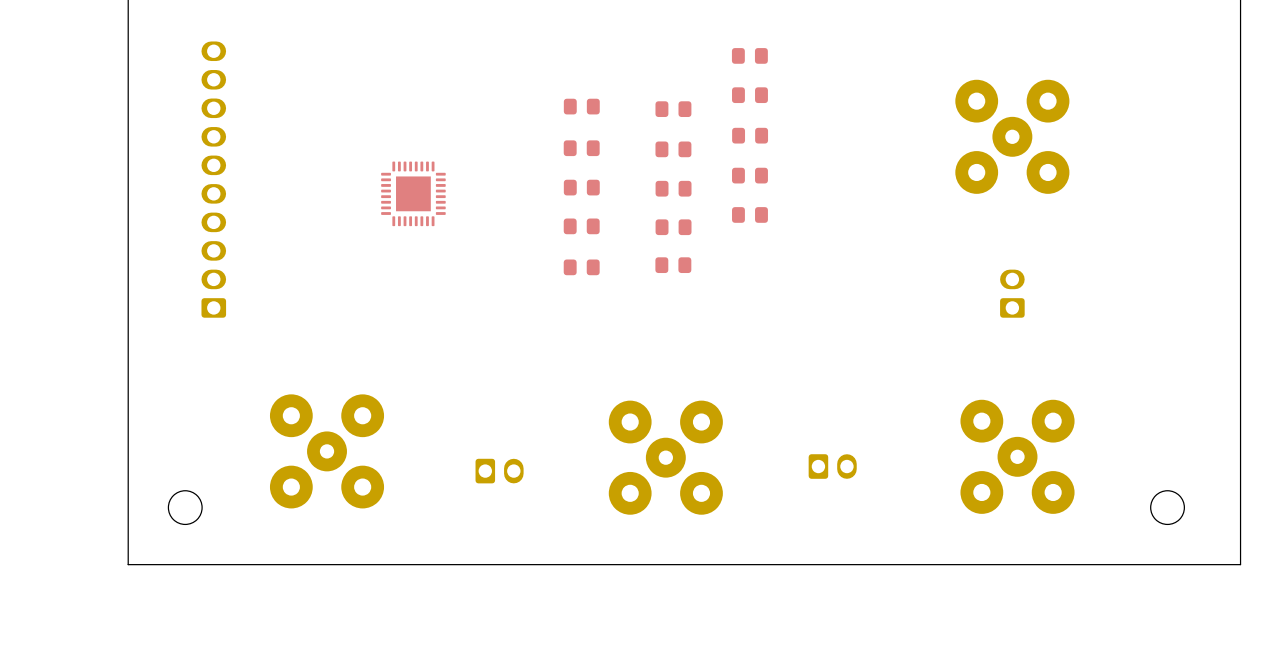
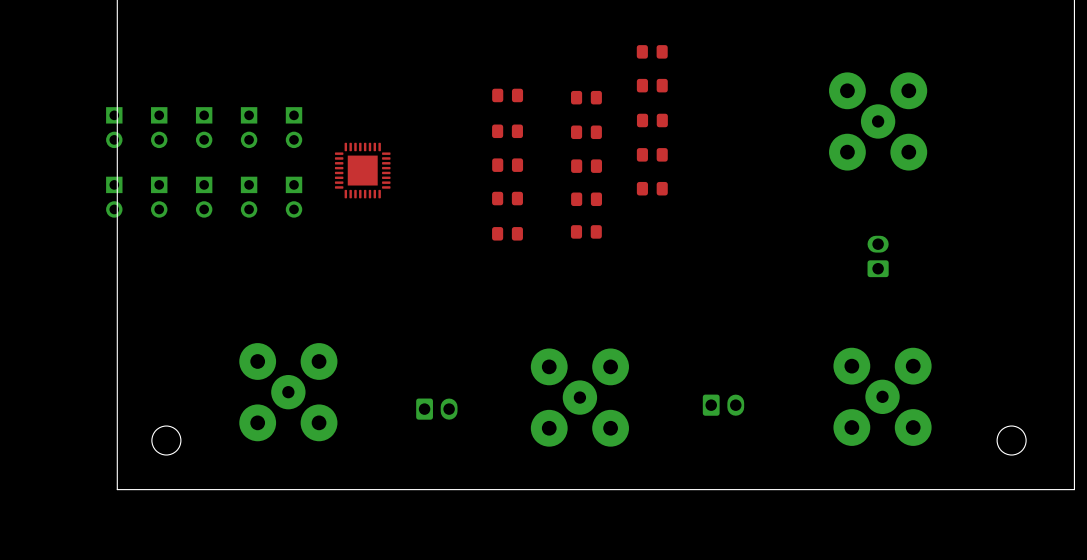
part: none -> (114, 127)
part: none -> (159, 127)
part: none -> (204, 127)
part: none -> (249, 127)
part: none -> (294, 127)
part: (213, 179) -> none
part: none -> (114, 197)
part: none -> (159, 197)
part: none -> (204, 197)
part: none -> (249, 197)
part: none -> (294, 197)

